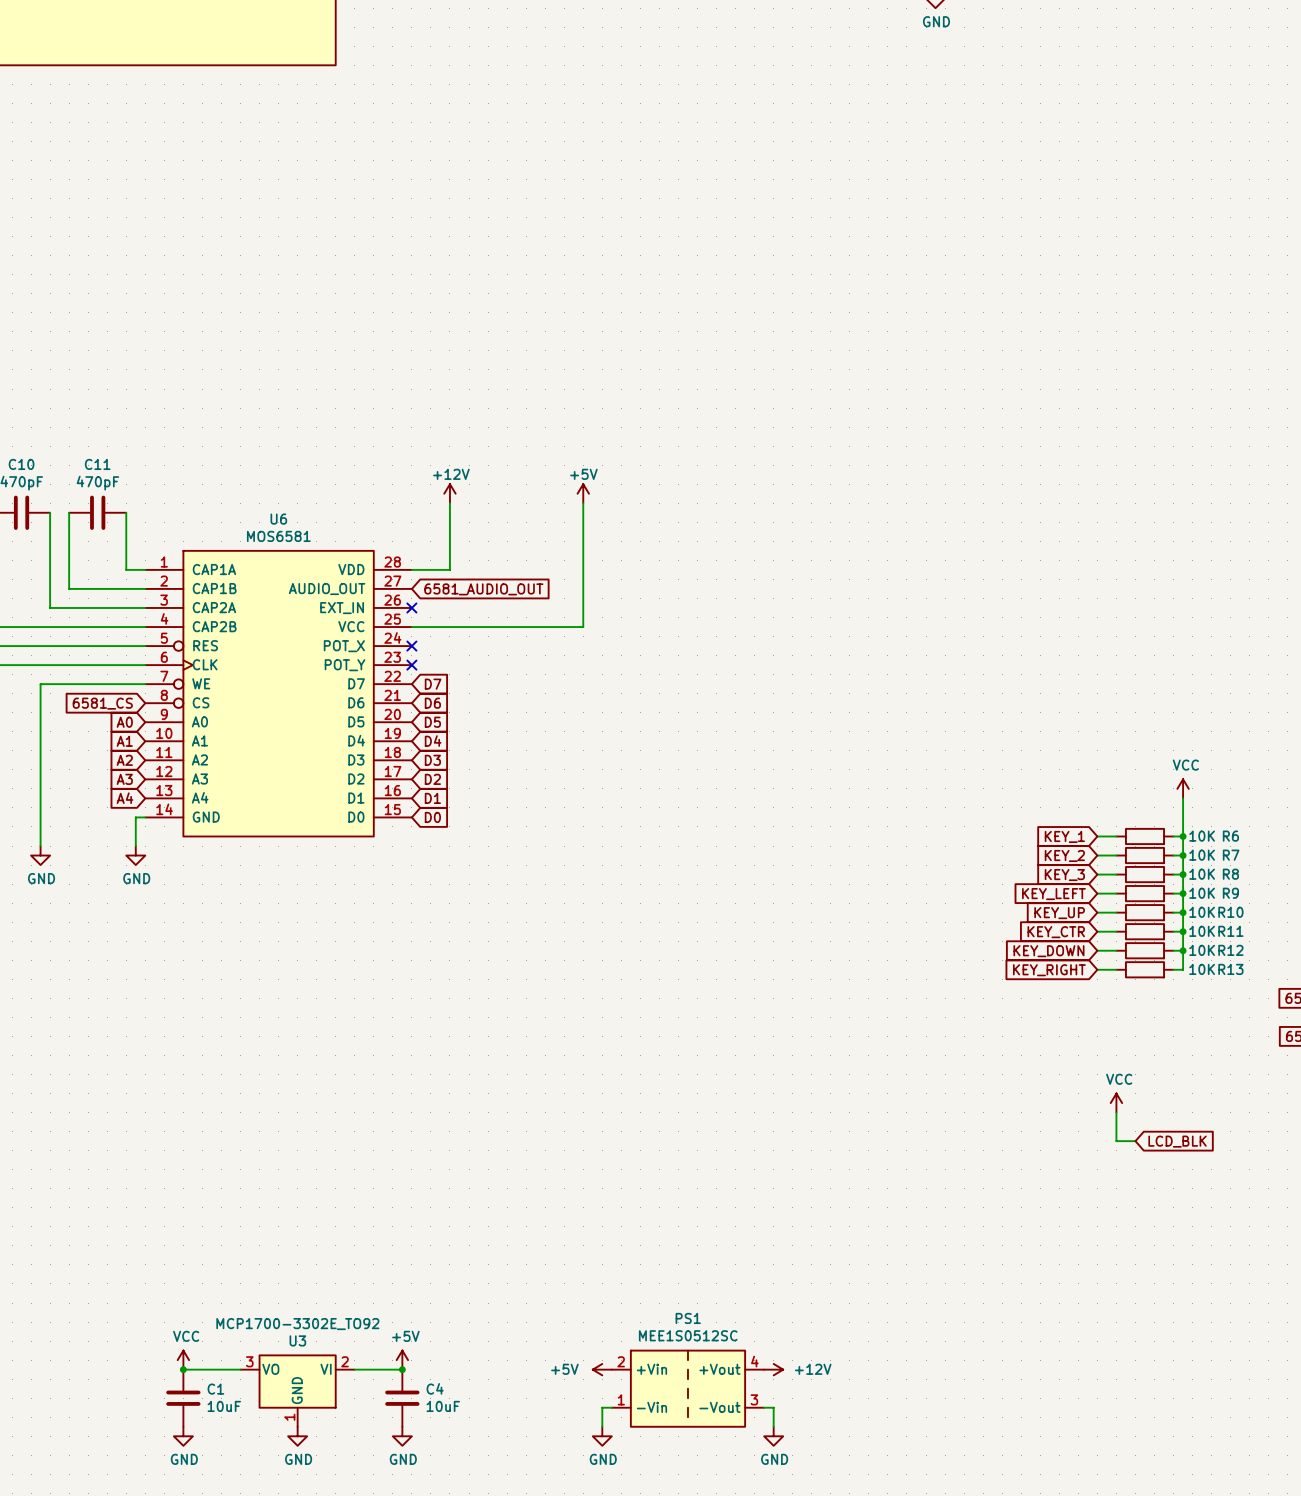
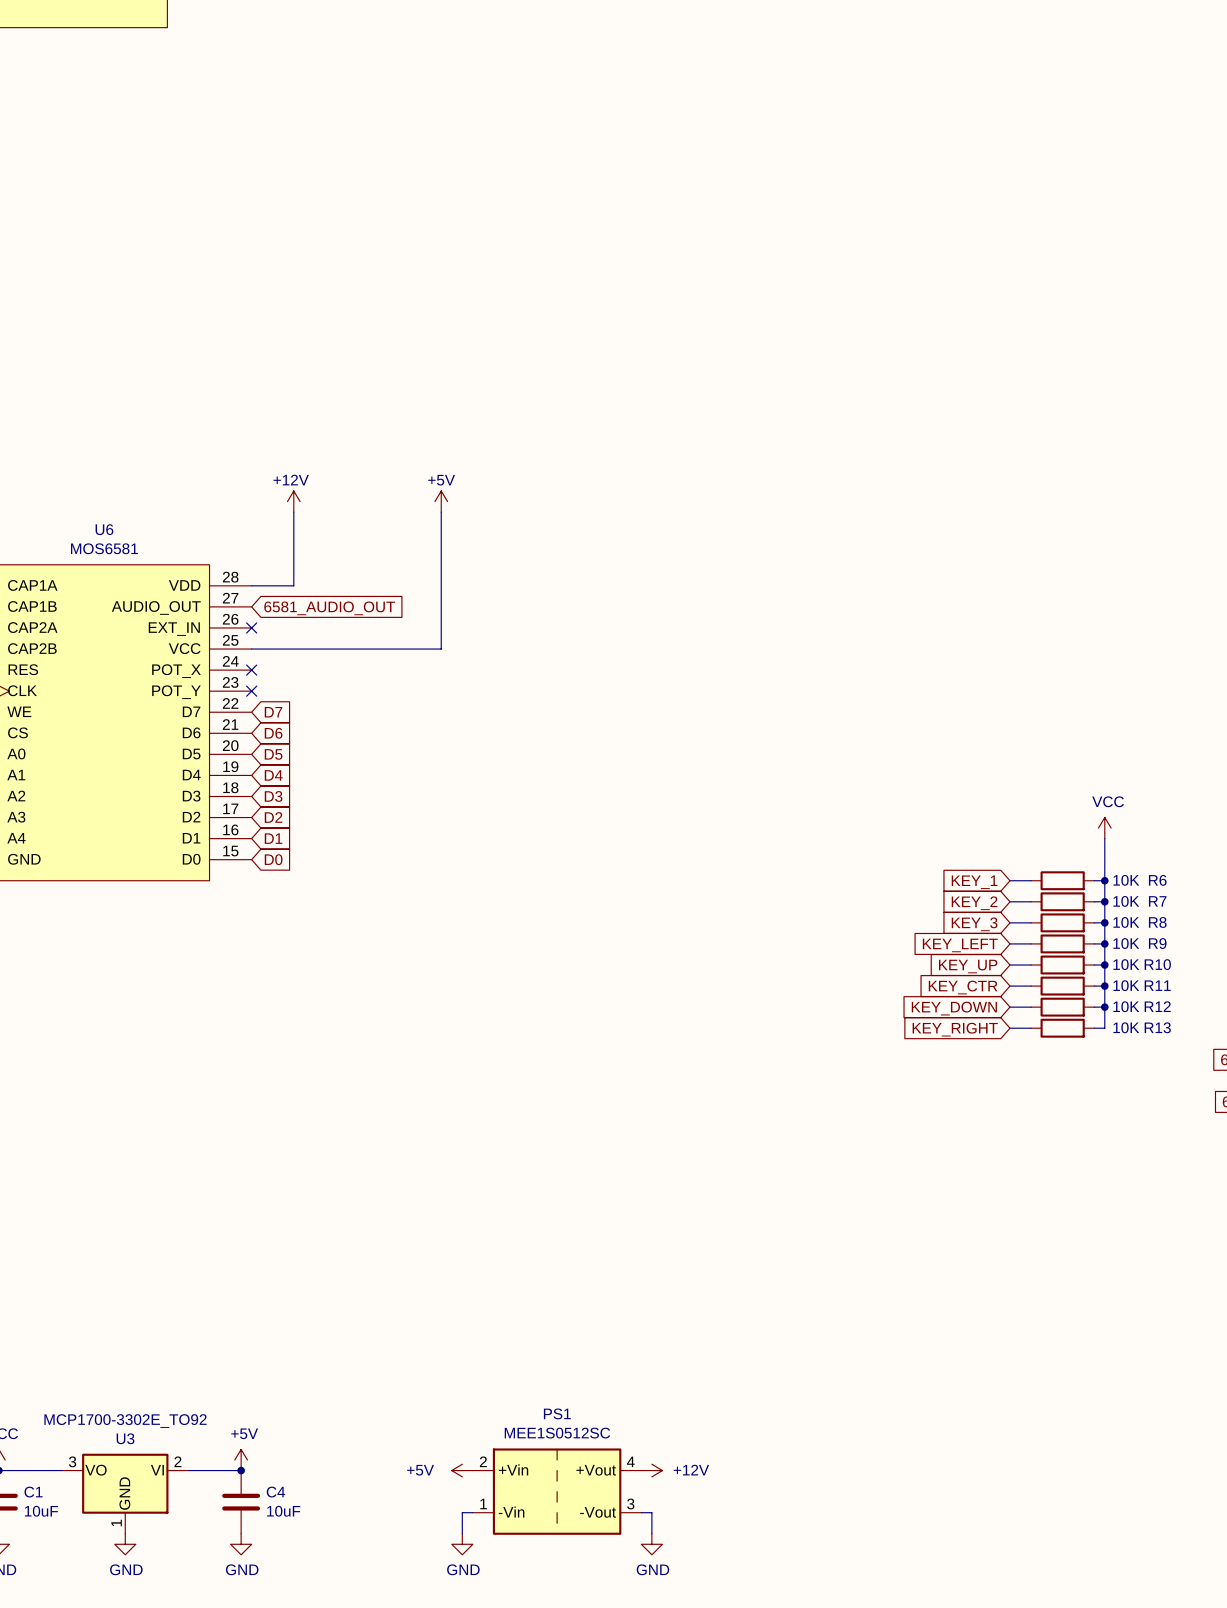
power symbol: VCC (1116, 1103) -> none
wire: (1116, 1112) (1116, 1141) (1135, 1141) -> none
global label: LCD_BLK (1177, 1141) -> none

